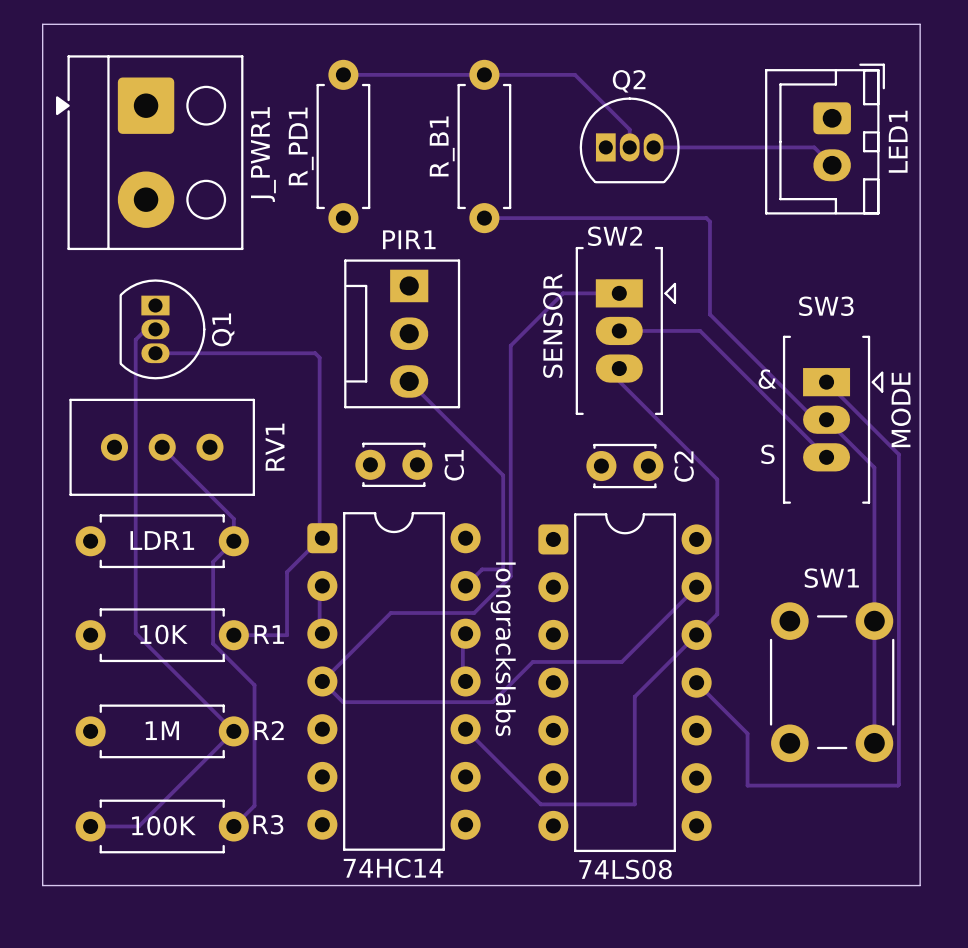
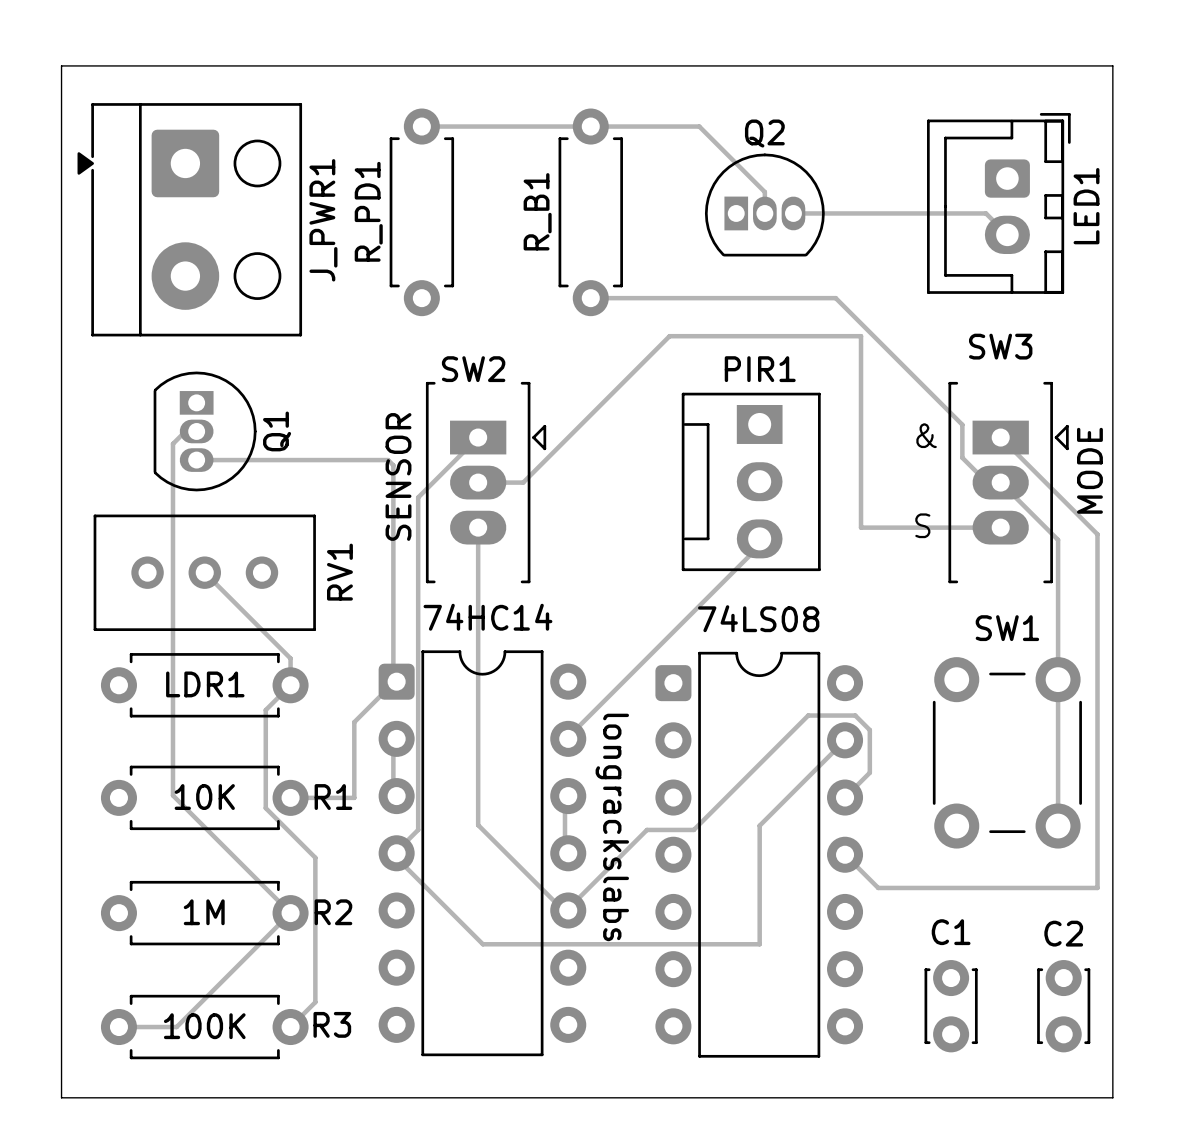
track: (688, 218) (706, 218) (709, 221) (709, 249) -> (835, 298) (962, 424) (962, 457) (987, 482)
track: none -> (861, 336) (669, 336) (523, 482) (478, 482)
track: (619, 293) (563, 293) (510, 345) (510, 576) (474, 613) (390, 613) (322, 681) (343, 702) (492, 702) (532, 661) -> (478, 527) (478, 825) (564, 911) (648, 829)
track: (709, 314) (815, 419) (826, 419) (874, 467) -> (861, 413) (861, 527) (1000, 527)
track: (619, 330) (700, 330) (826, 457) -> none
SW2 position: (625, 330) -> (486, 482)
PIR1 position: (402, 333) -> (751, 481)
track: none -> (478, 437) (418, 497) (418, 829) (393, 854) (482, 944) (759, 944) (759, 825)
track: none -> (1000, 482) (1058, 539) (1058, 597)
text position: & (767, 379) -> & (926, 435)
track: (409, 381) (503, 475) (503, 569) (482, 569) (465, 585) -> none
track: (619, 381) (717, 479) (717, 578) -> none
track: (826, 382) (898, 454) (898, 784) (747, 785) (747, 733) (724, 710) -> (1000, 437) (1097, 534) (1097, 887) (878, 887)
track: none -> (759, 538) (759, 545) (564, 740)
SW3 position: (833, 419) -> (1008, 482)
text position: S (767, 454) -> S (922, 525)
C1 rotation: 0° (393, 464) -> 90° clockwise (951, 1006)
C1 position: (393, 464) -> (951, 1006)
C1 name position: C1 (454, 465) -> C1 (951, 932)
C2 rotation: 0° (624, 466) -> 90° clockwise (1063, 1006)
C2 position: (624, 466) -> (1063, 1006)
C2 name position: C2 (684, 466) -> C2 (1063, 933)
track: (696, 634) (634, 696) (634, 804) (540, 804) (465, 729) -> none
track: (625, 658) (621, 661) (570, 661) -> (869, 730) (855, 715) (808, 715) (693, 829)
track: (874, 658) (874, 743) -> none
SW1 position: (832, 682) -> (1007, 752)
part value position: 74HC14 (393, 868) -> 74HC14 (487, 617)
part value position: 74LS08 (625, 869) -> 74LS08 (758, 618)

